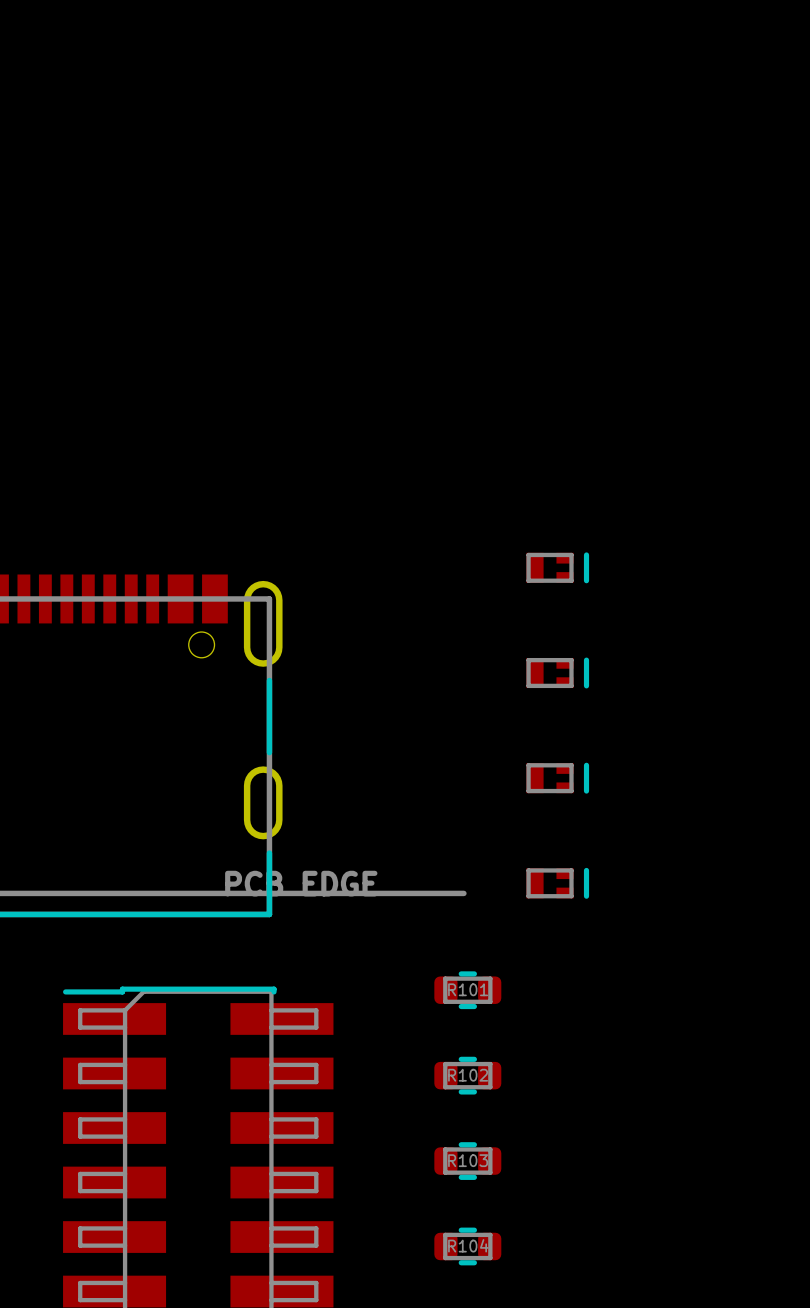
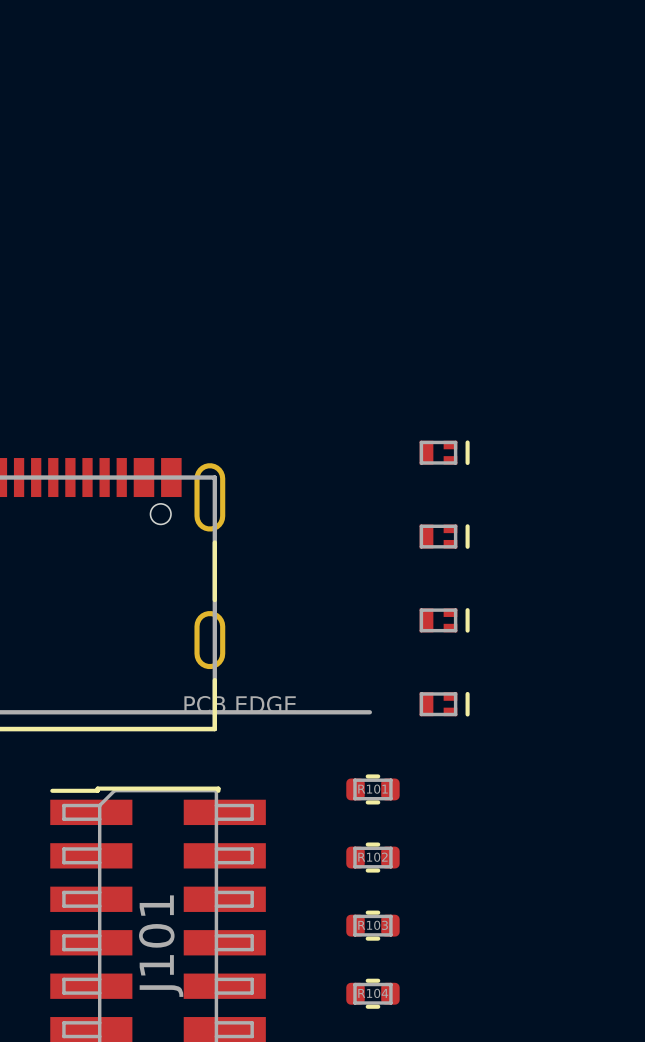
J101 name: none -> J101 (161, 946)

